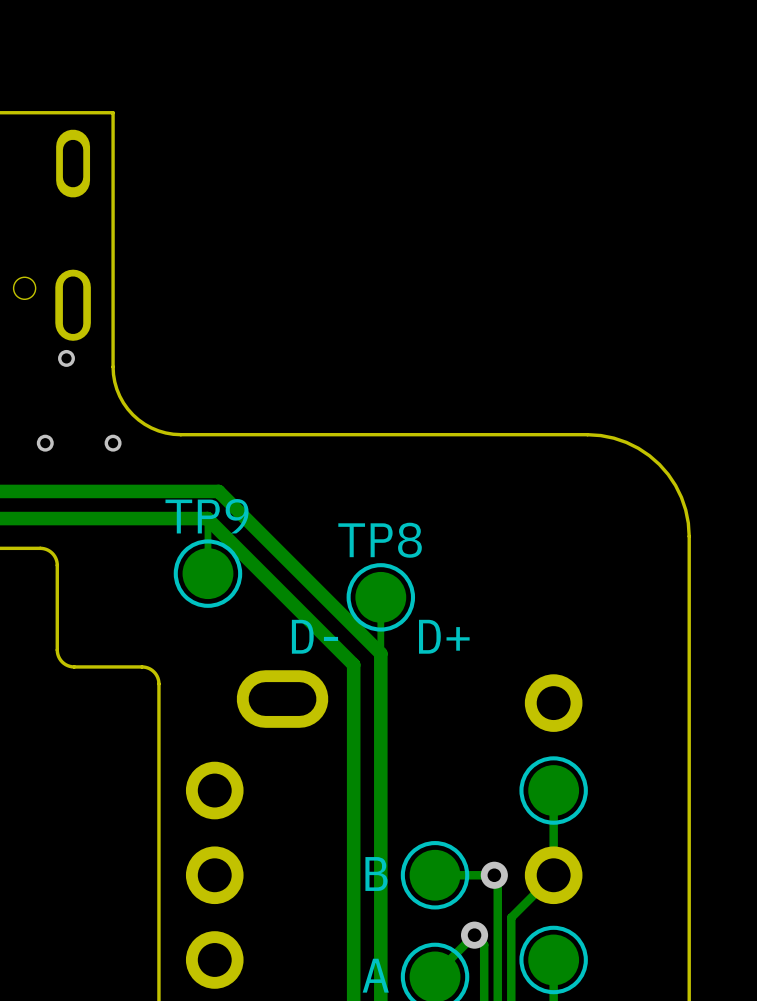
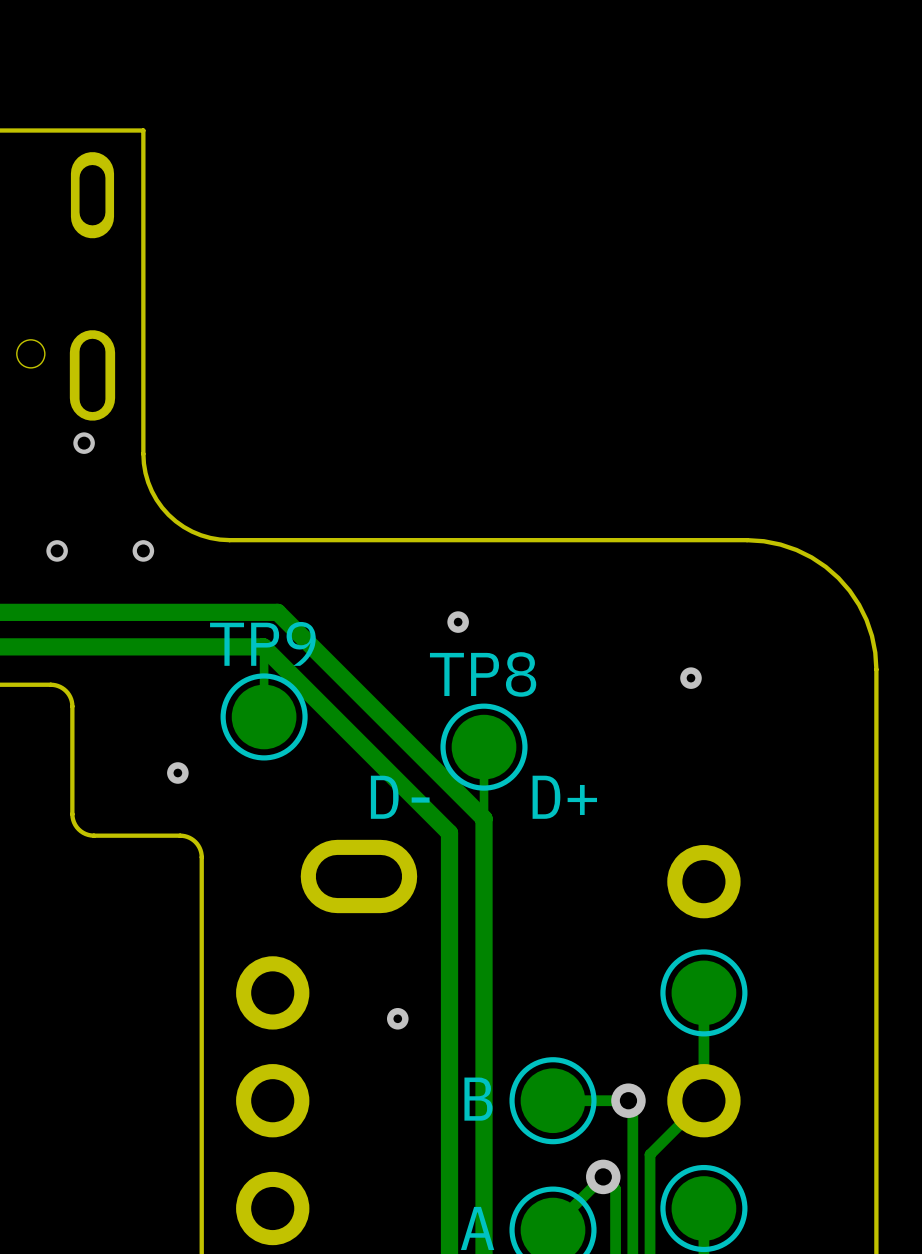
via: none -> (458, 622)
via: none -> (690, 678)
via: none -> (177, 773)
via: none -> (397, 1018)

